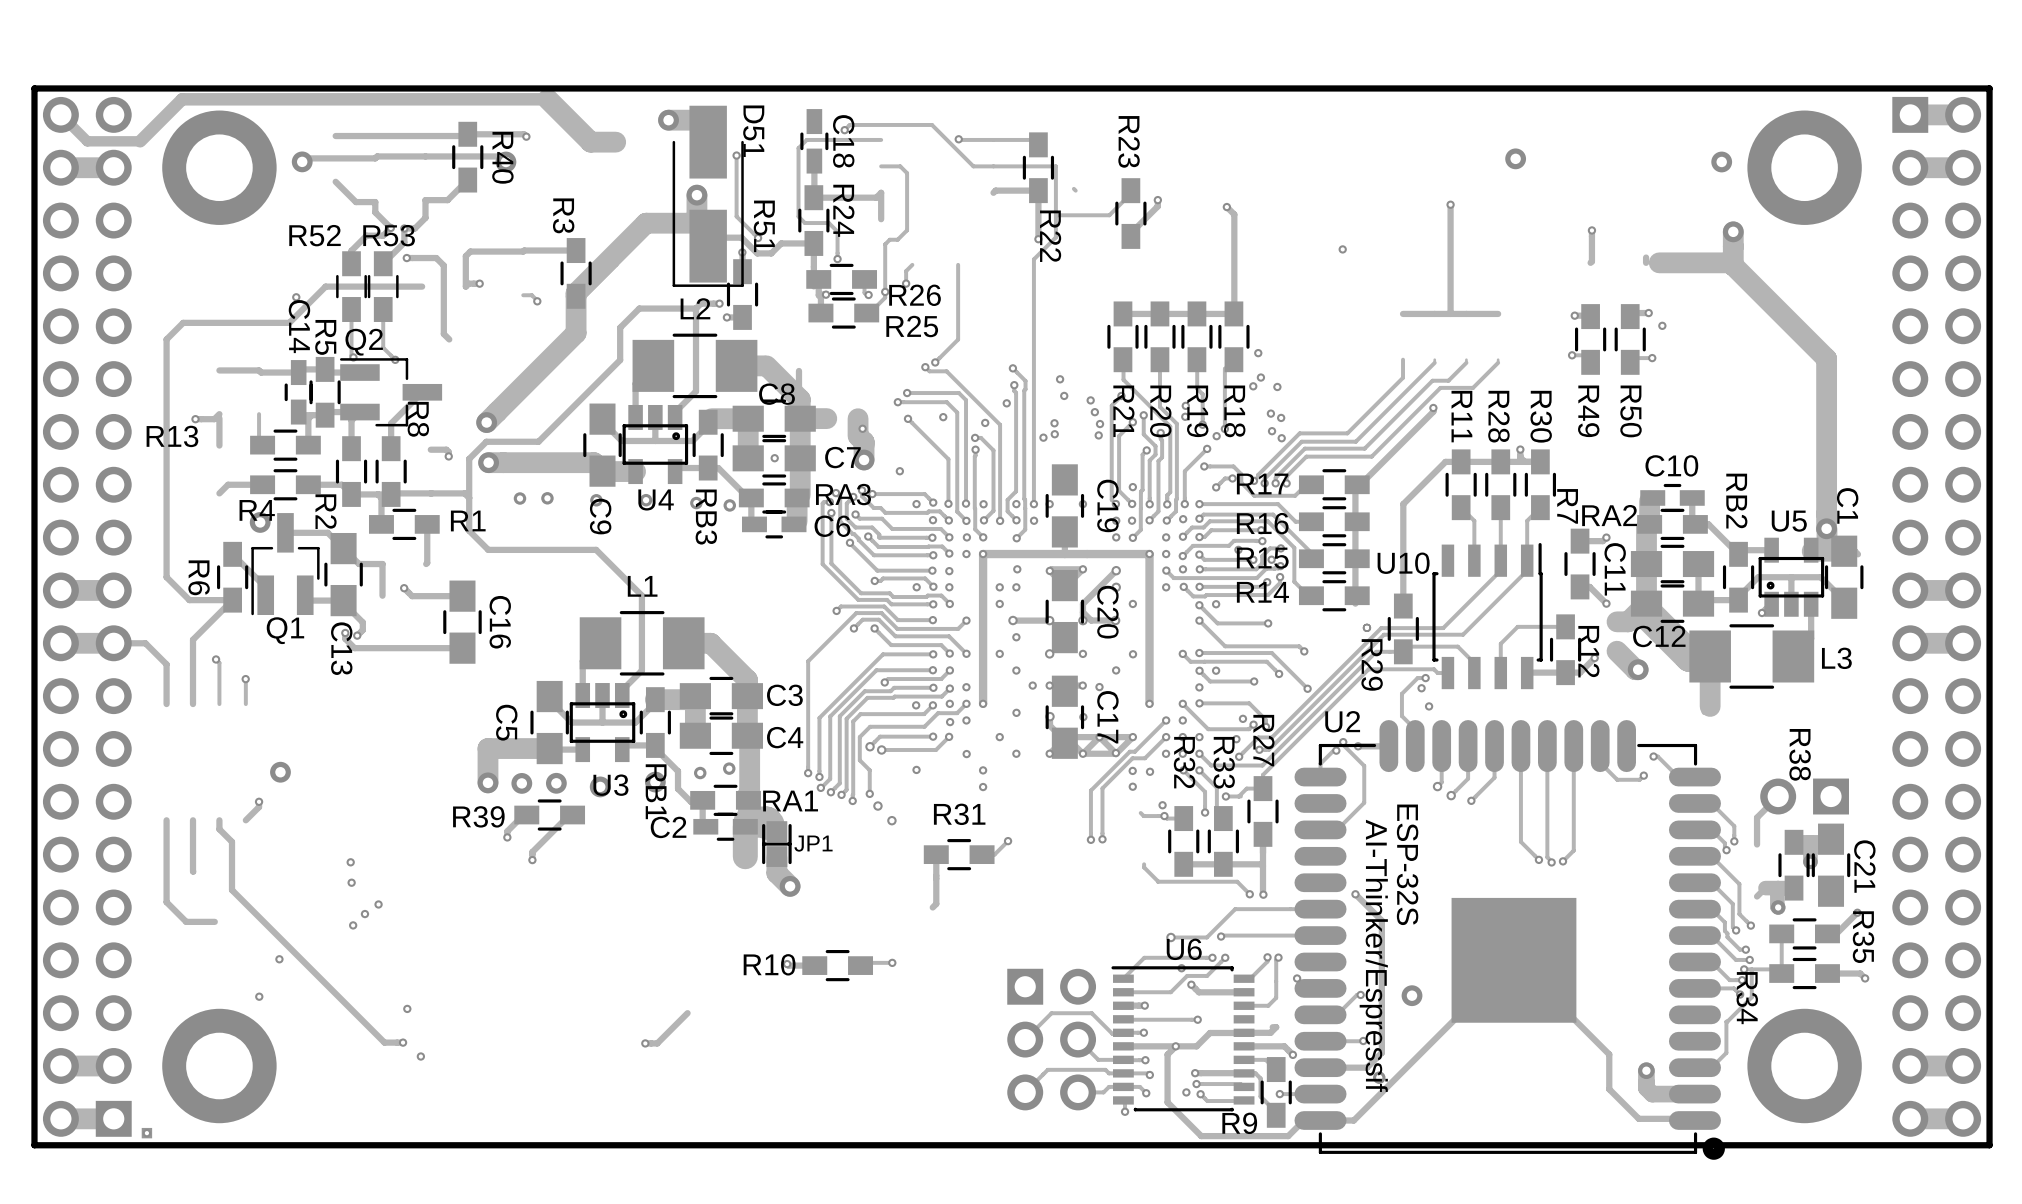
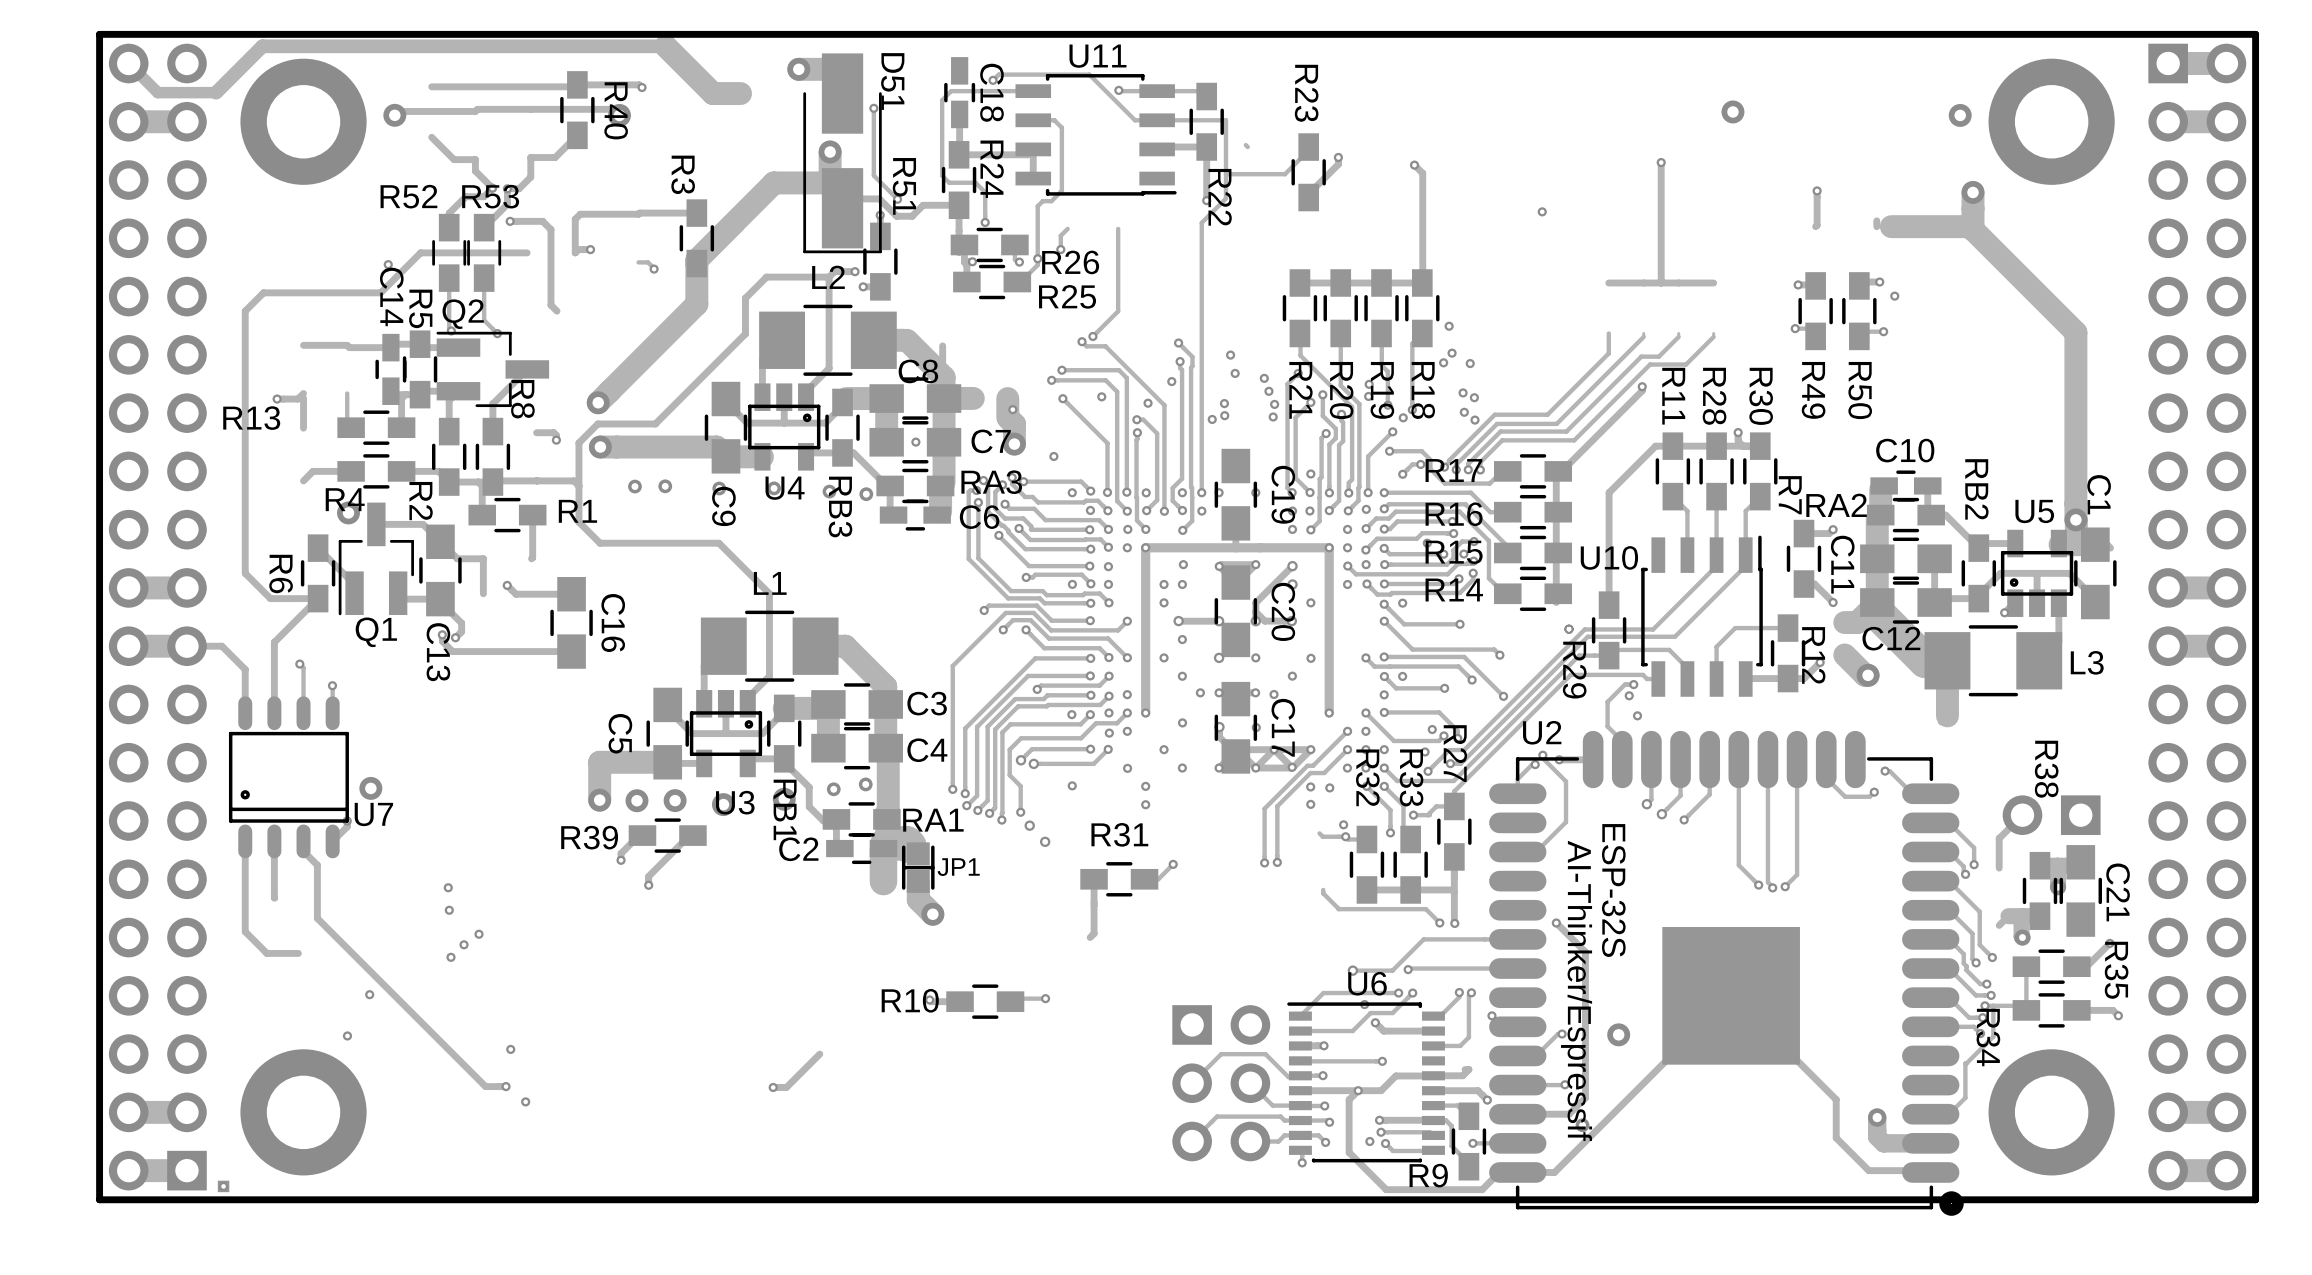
U11: none -> (1096, 134)
U7: none -> (288, 777)

